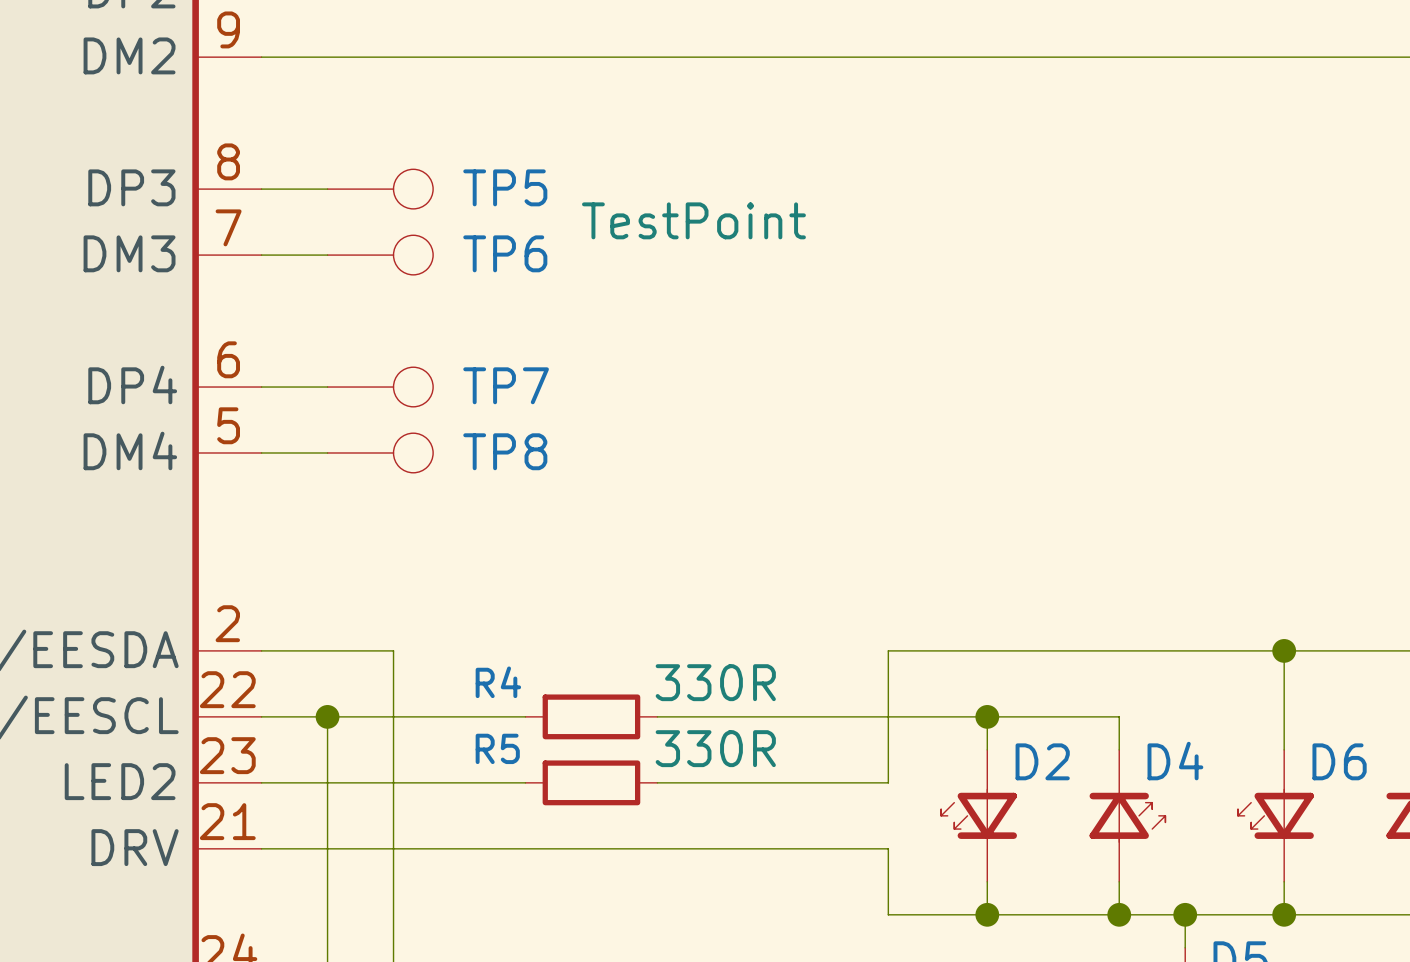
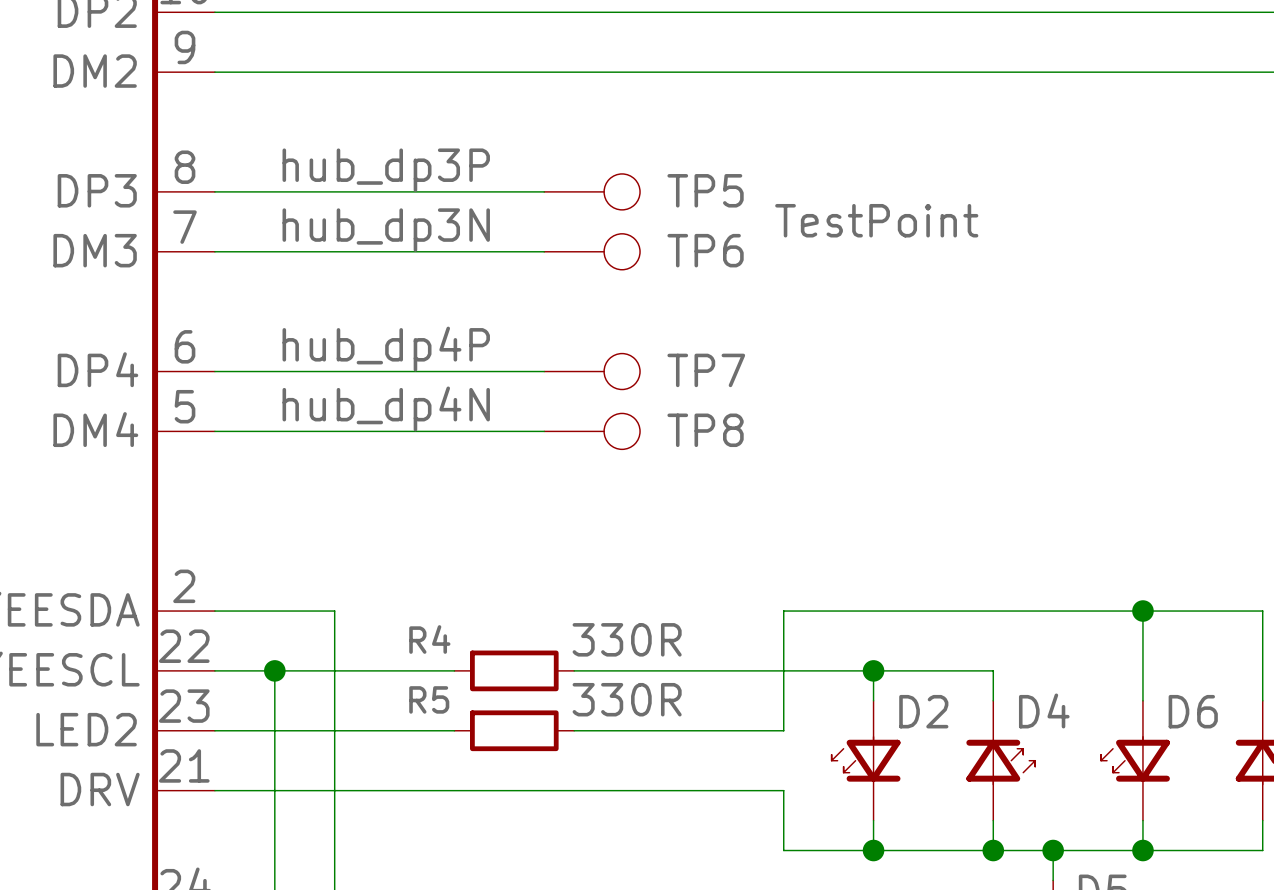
label: none -> hub_dp3P (386, 170)
wire: none -> (274, 191) (544, 191)
TP5 position: (380, 189) -> (592, 191)
label: none -> hub_dp3N (386, 230)
wire: none -> (274, 251) (544, 251)
TP6 position: (380, 255) -> (592, 251)
label: none -> hub_dp4P (386, 349)
wire: none -> (274, 371) (544, 371)
TP7 position: (380, 387) -> (592, 371)
label: none -> hub_dp4N (386, 408)
wire: none -> (274, 431) (544, 431)
TP8 position: (380, 452) -> (592, 431)

